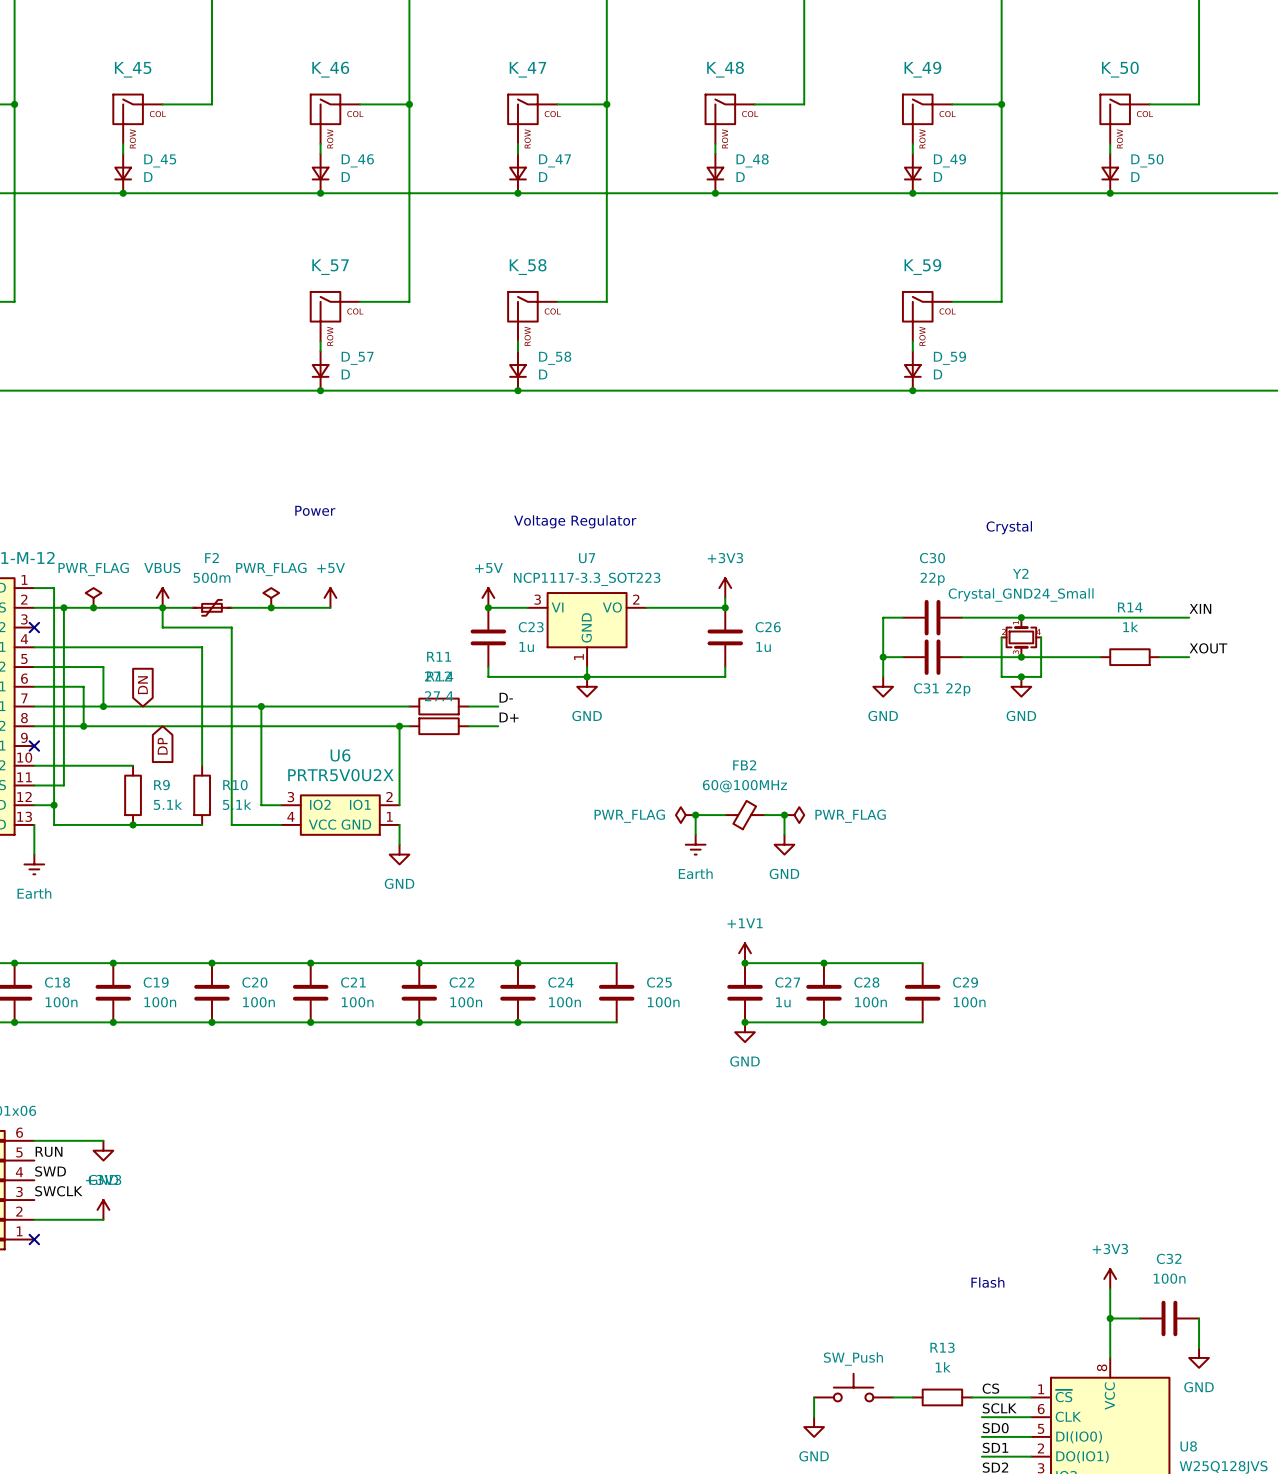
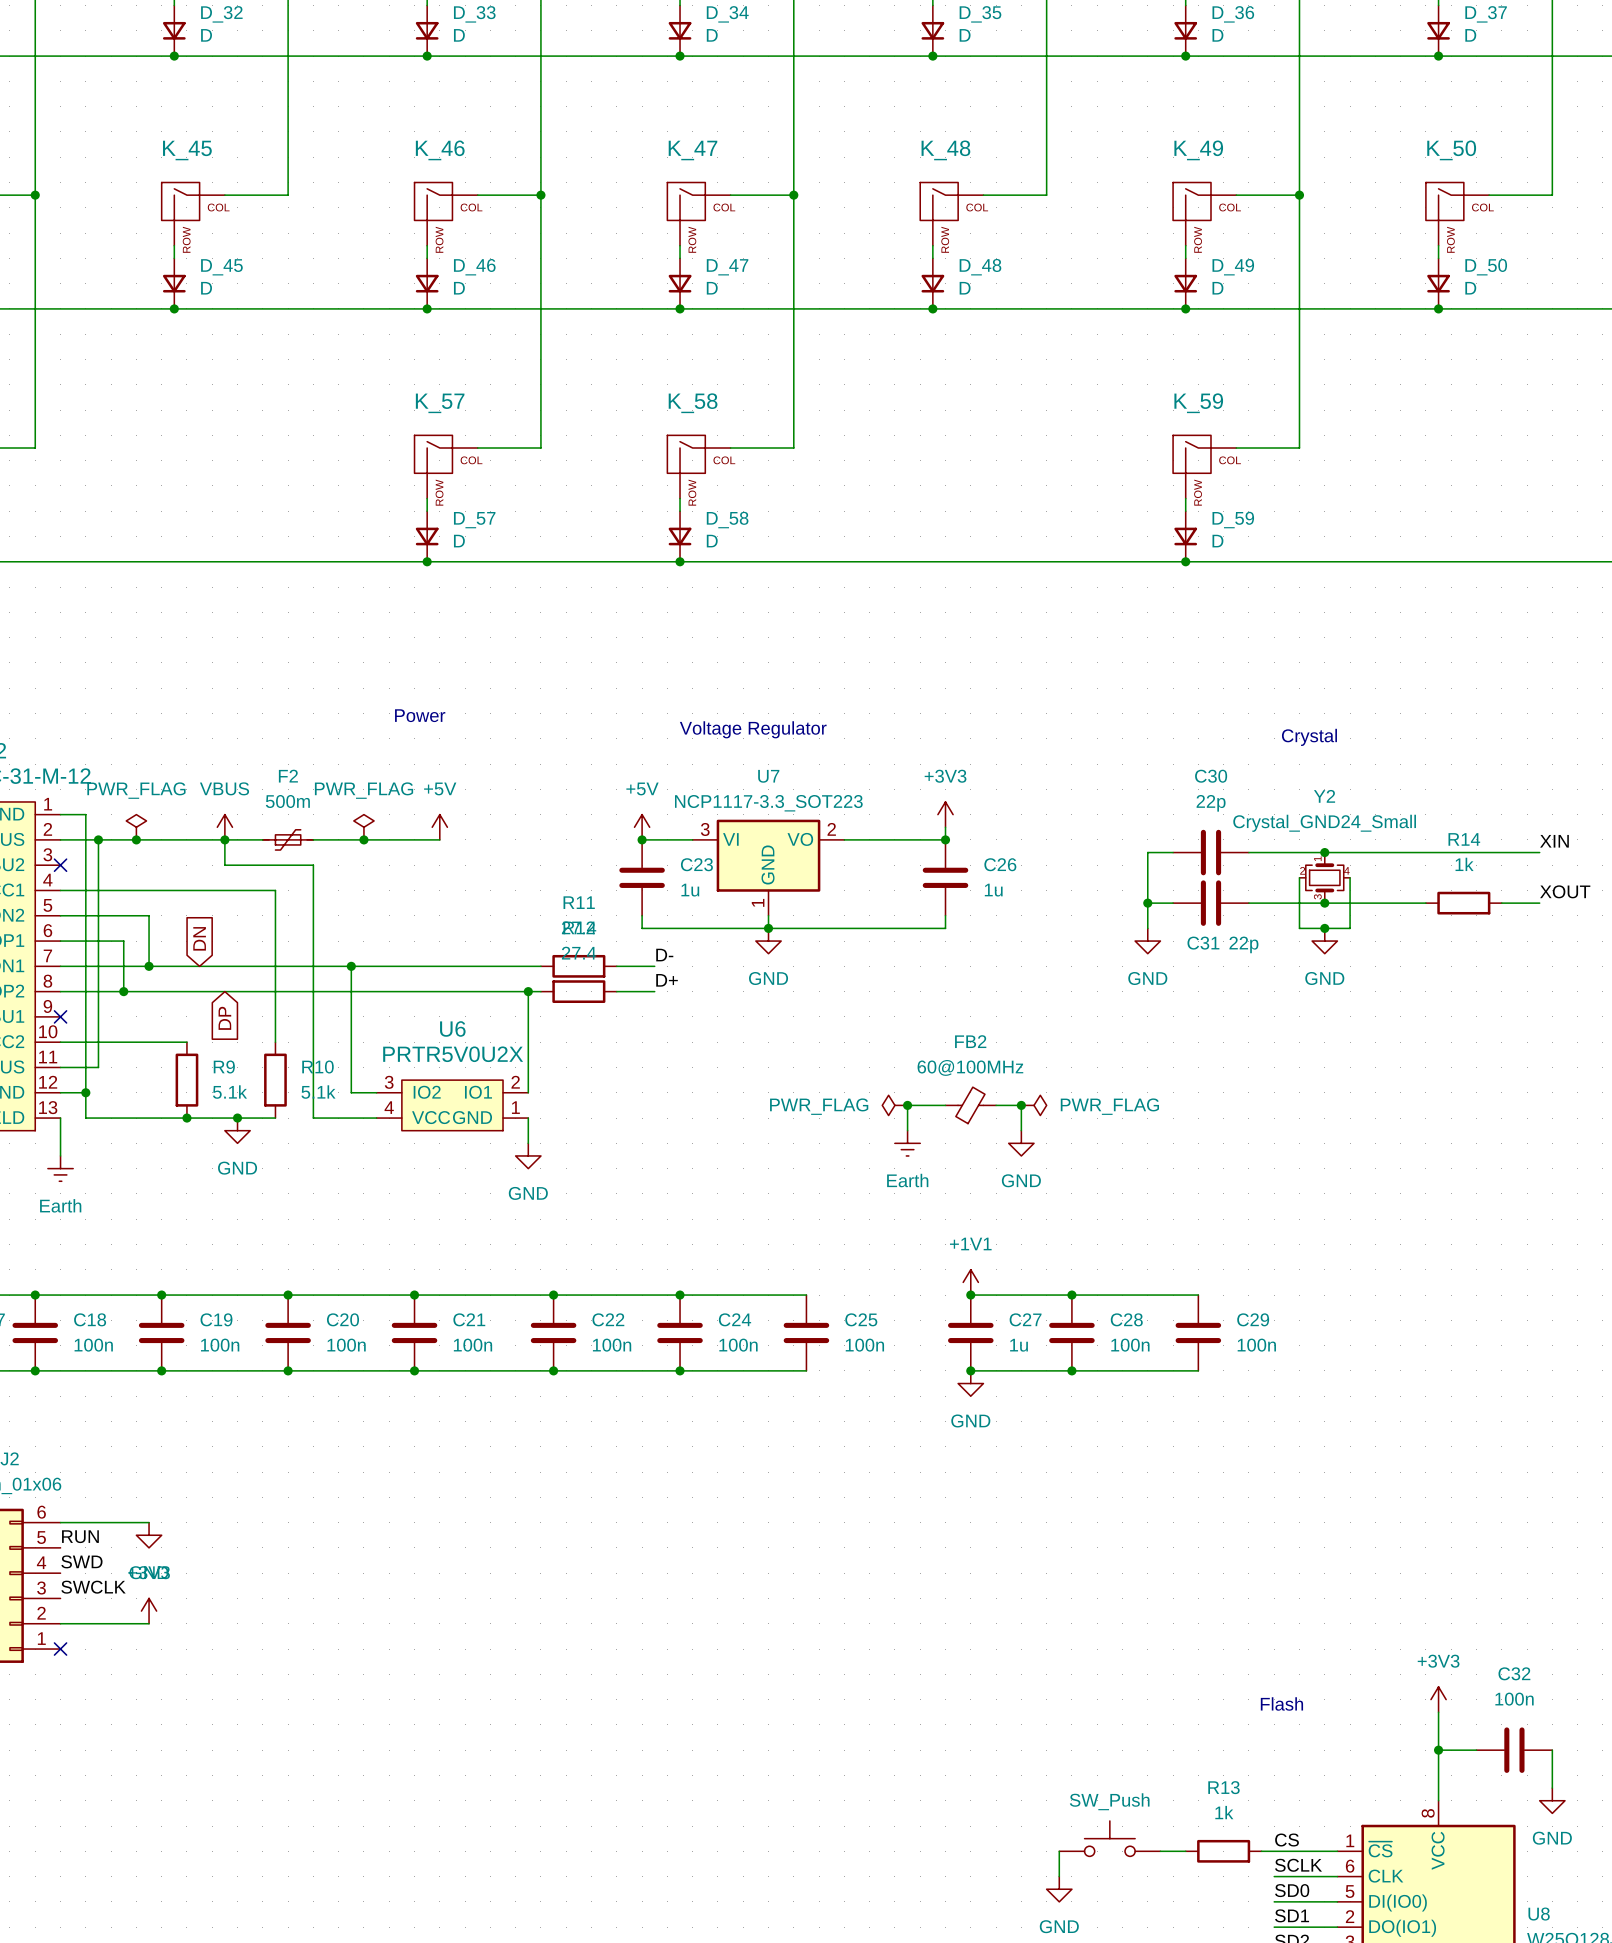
junction: none -> (237, 1118)
power symbol: none -> GND (237, 1130)

